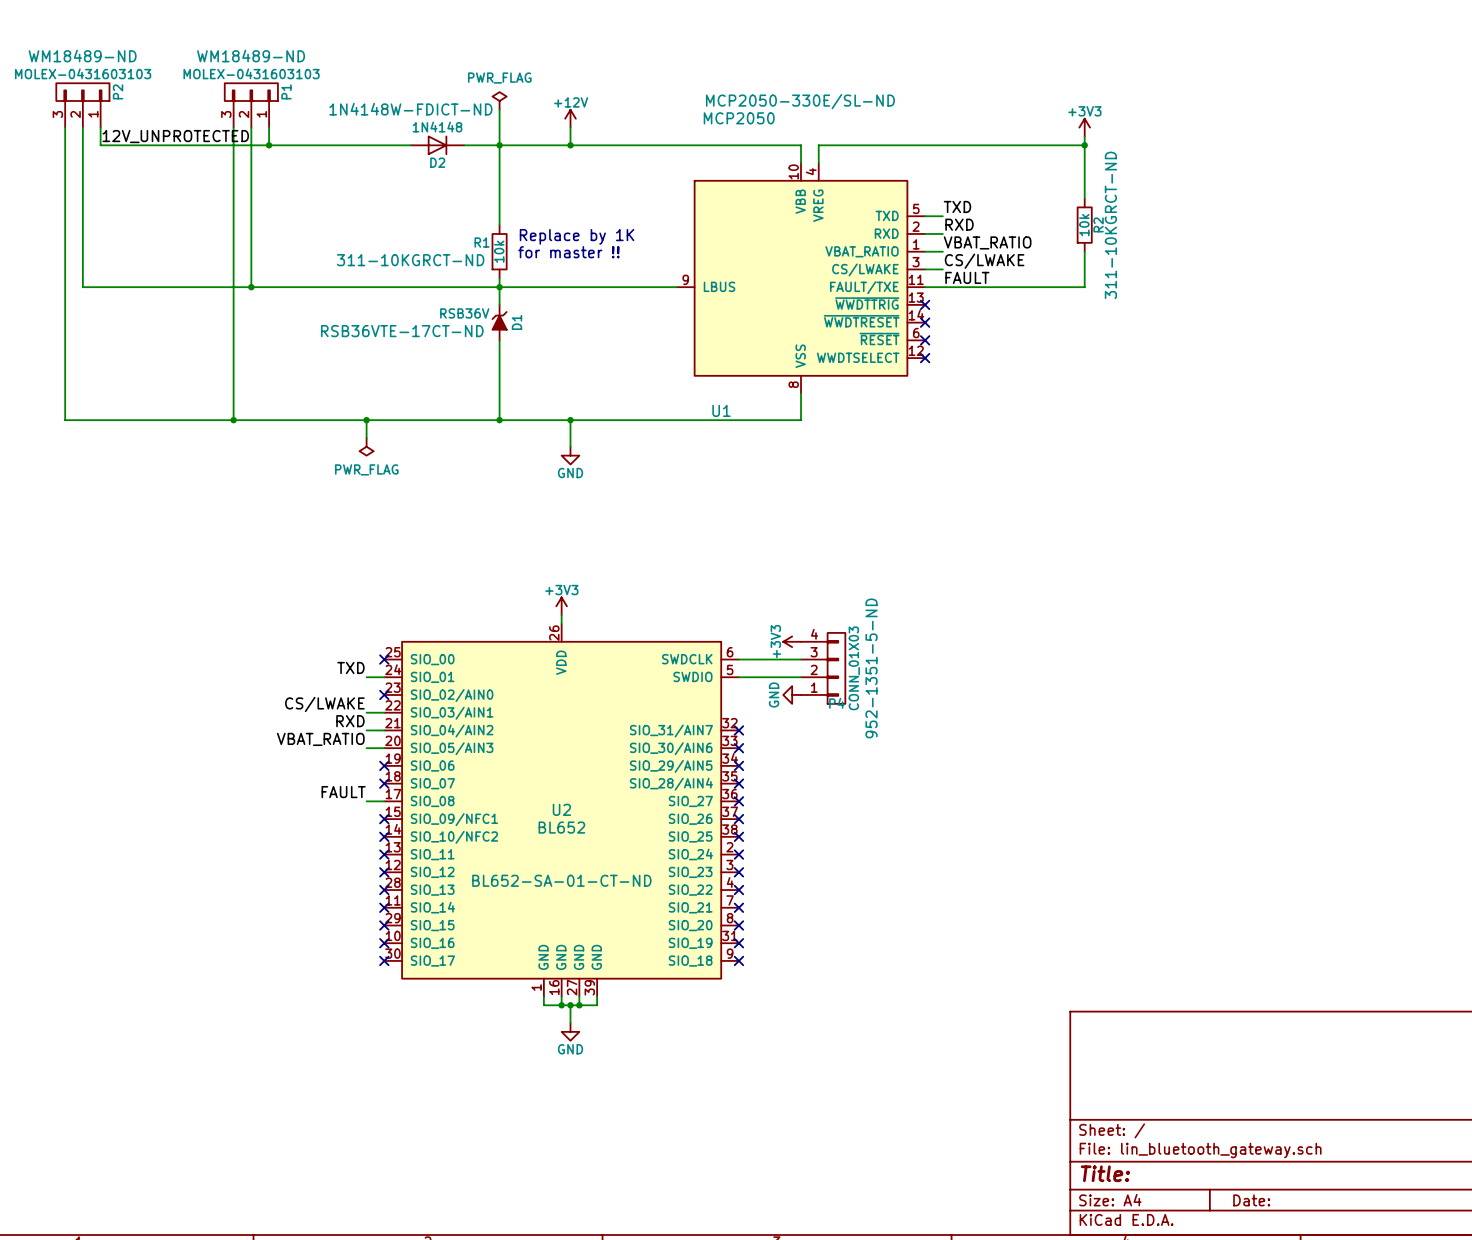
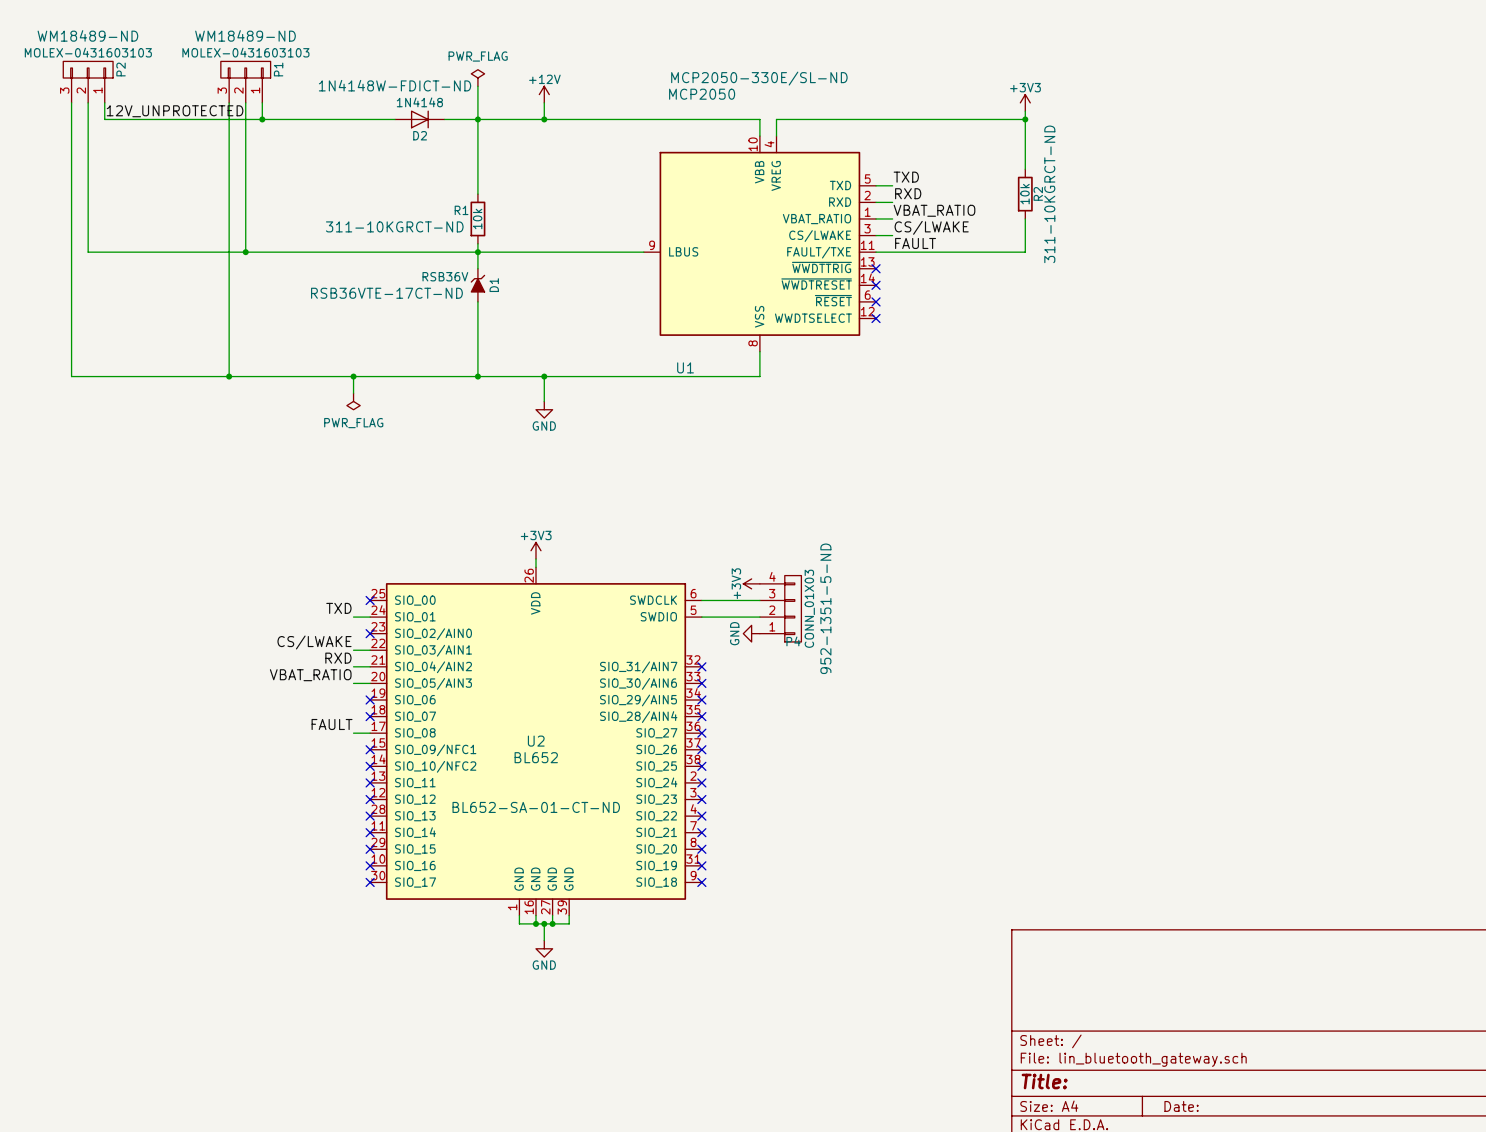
text: Replace by 1K (577, 236) -> none
text: for master !! (568, 252) -> none

